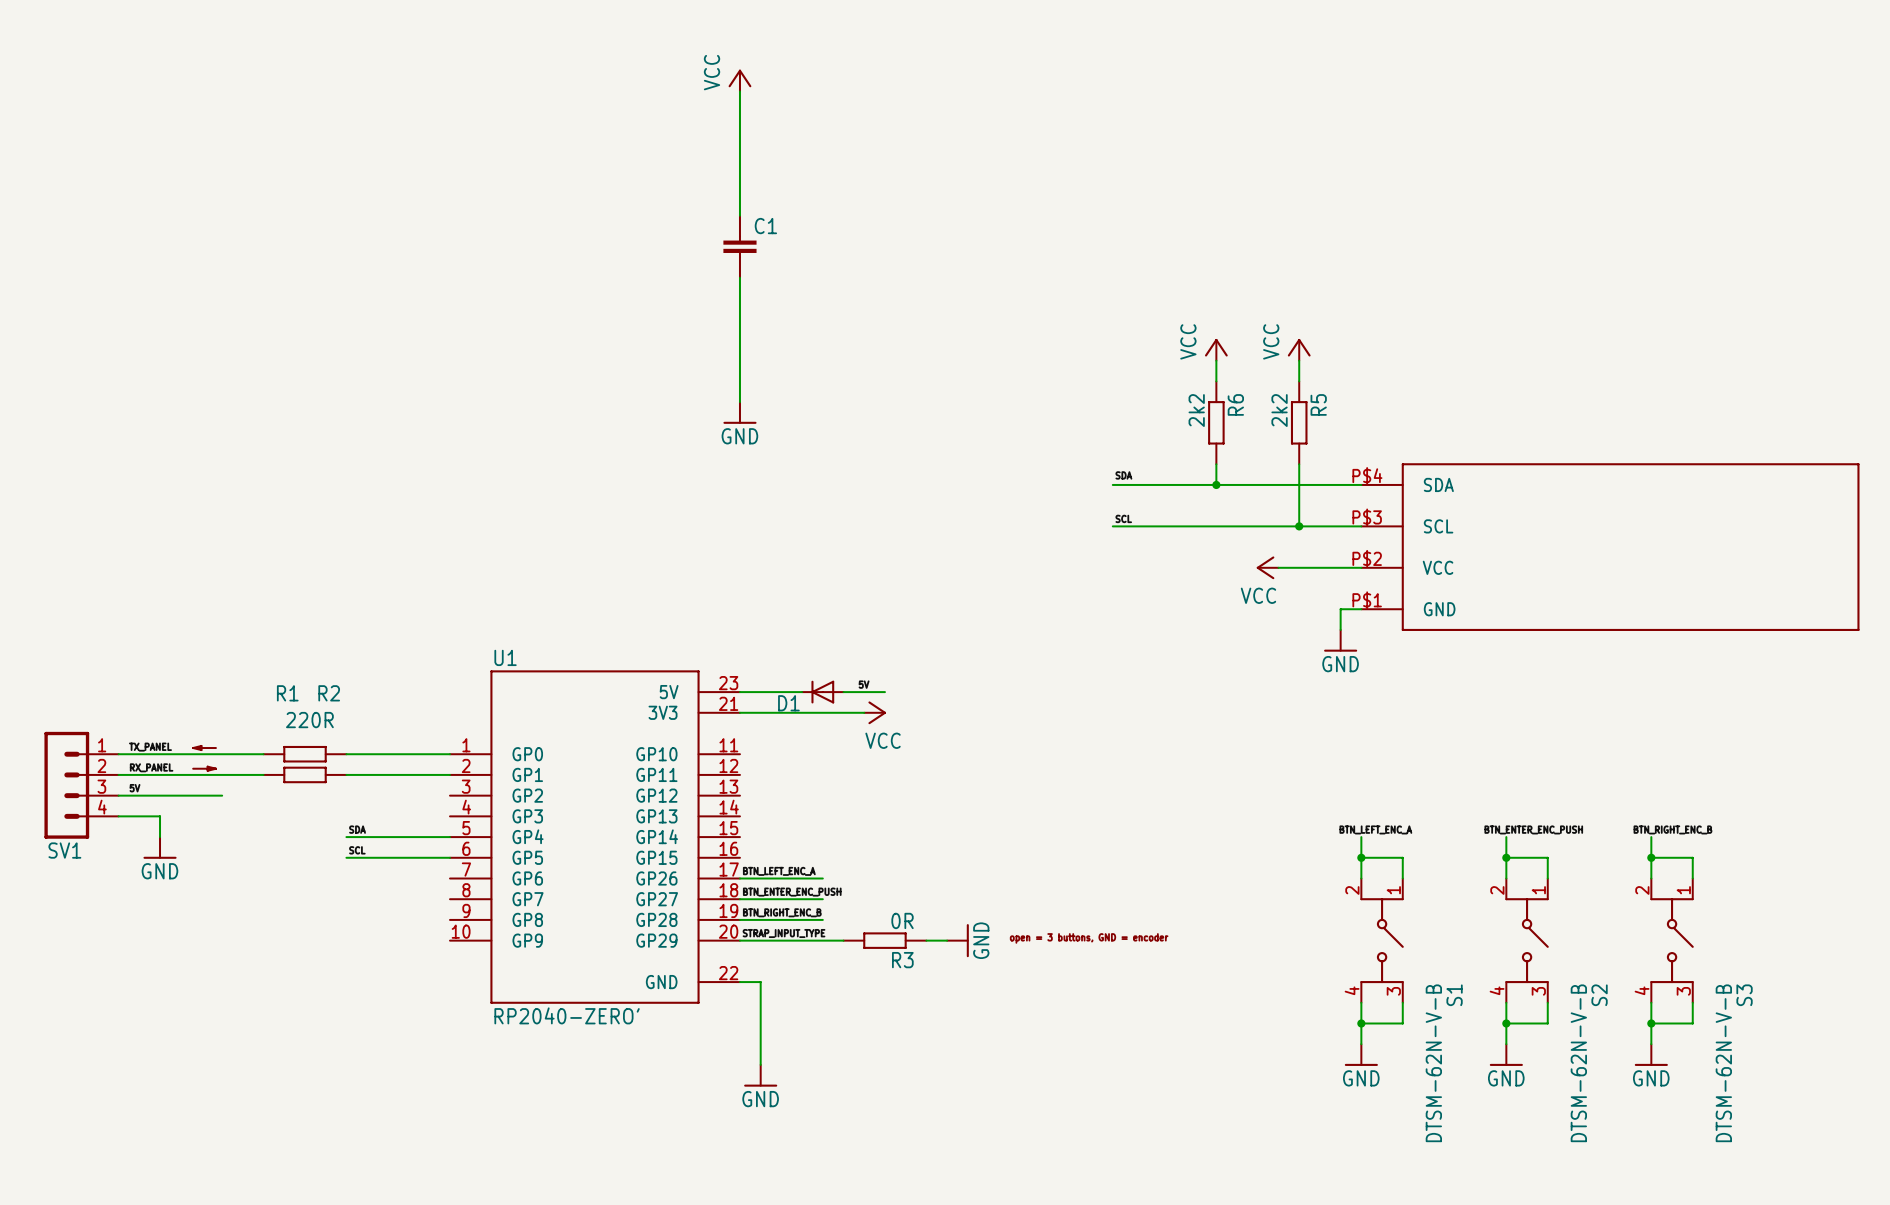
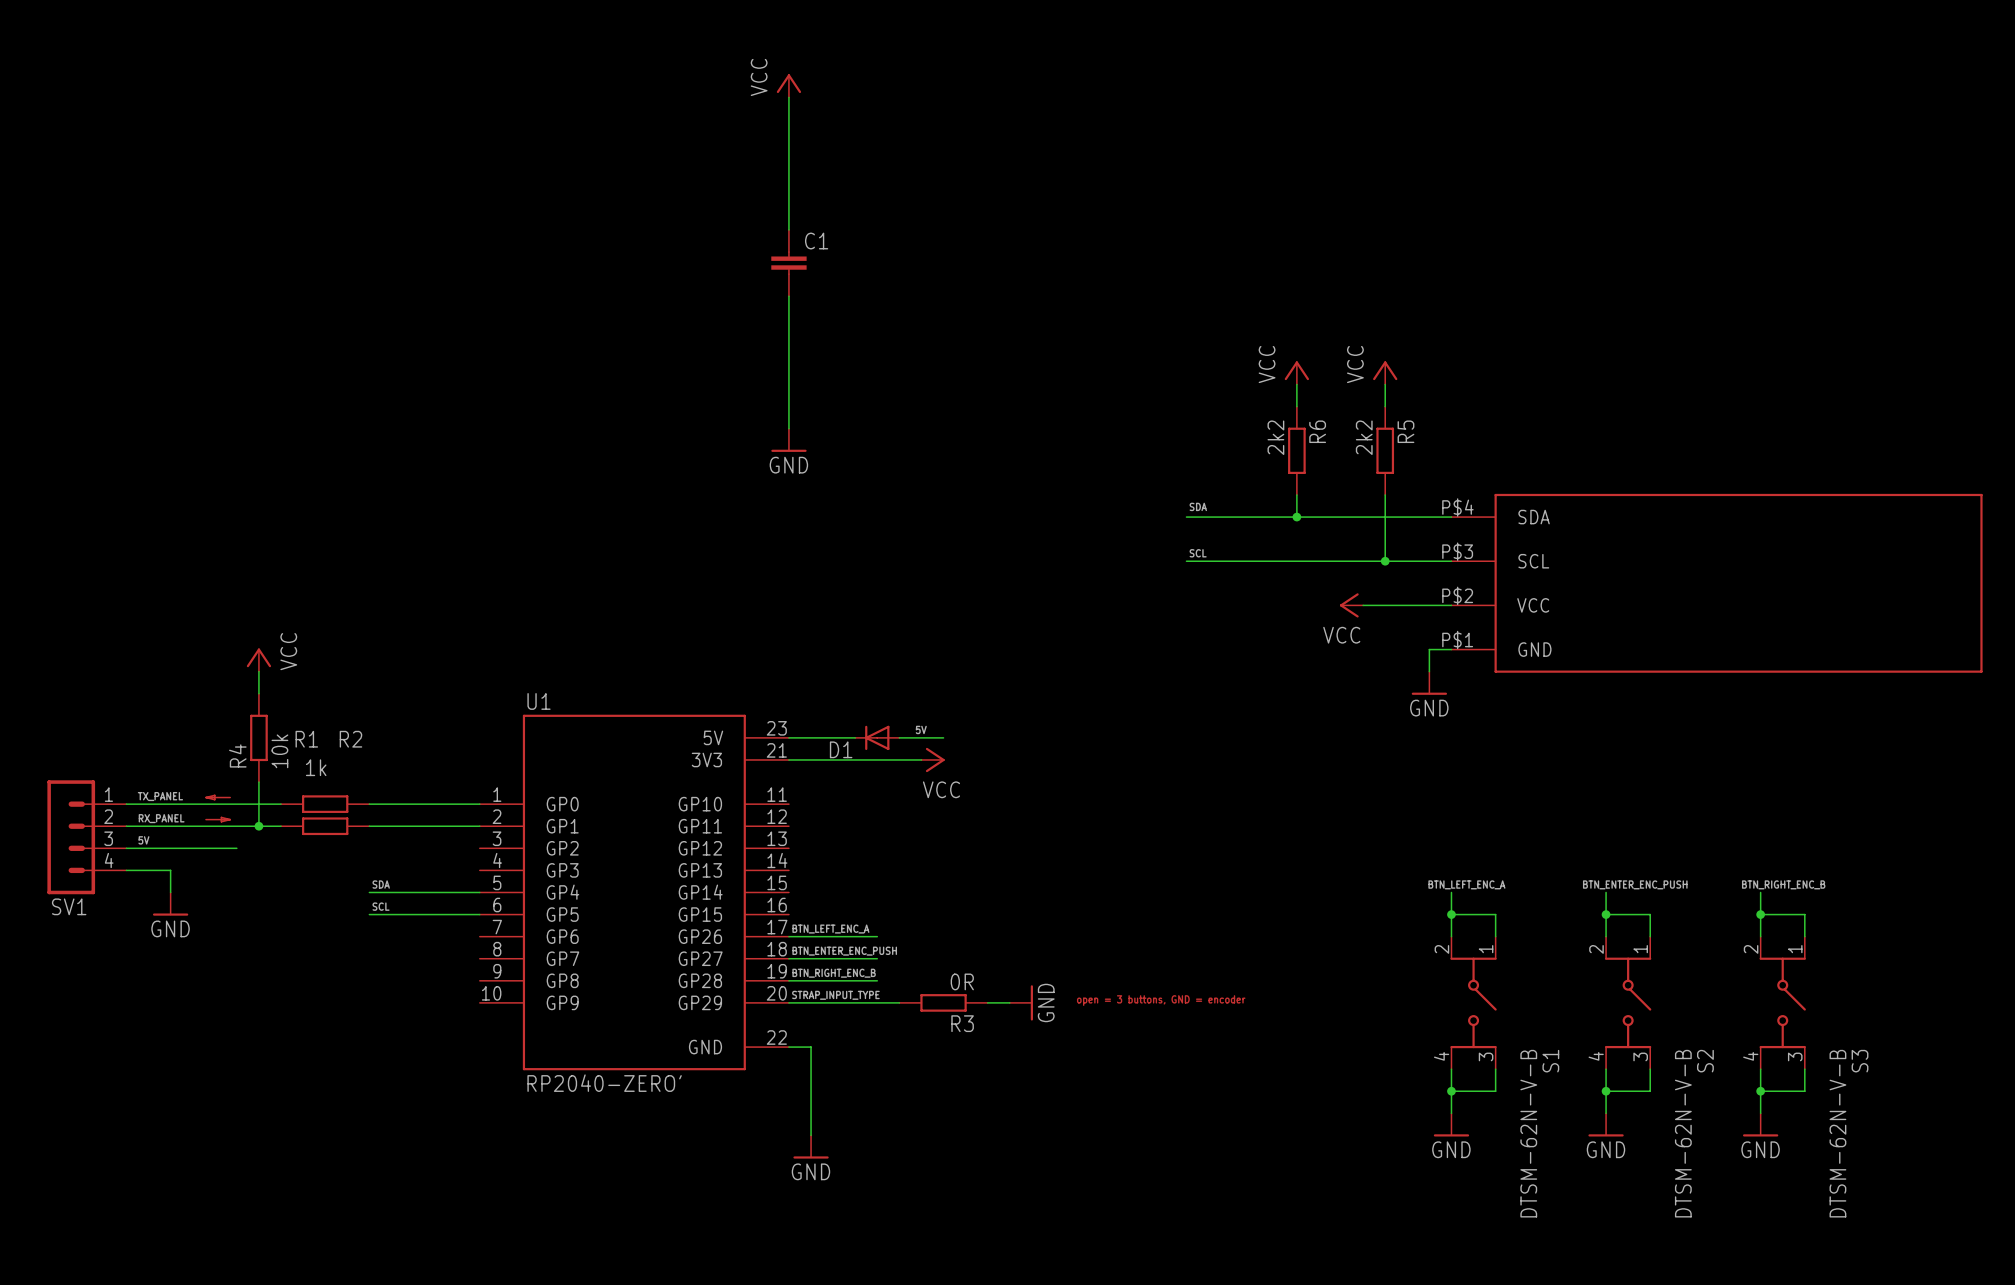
power symbol: none -> VCC (258, 660)
wire: none -> (258, 671) (258, 693)
R4: none -> 10k (258, 737)
R1 value: 220R (309, 720) -> 1k (316, 767)
wire: none -> (258, 782) (258, 826)
junction: none -> (258, 826)

